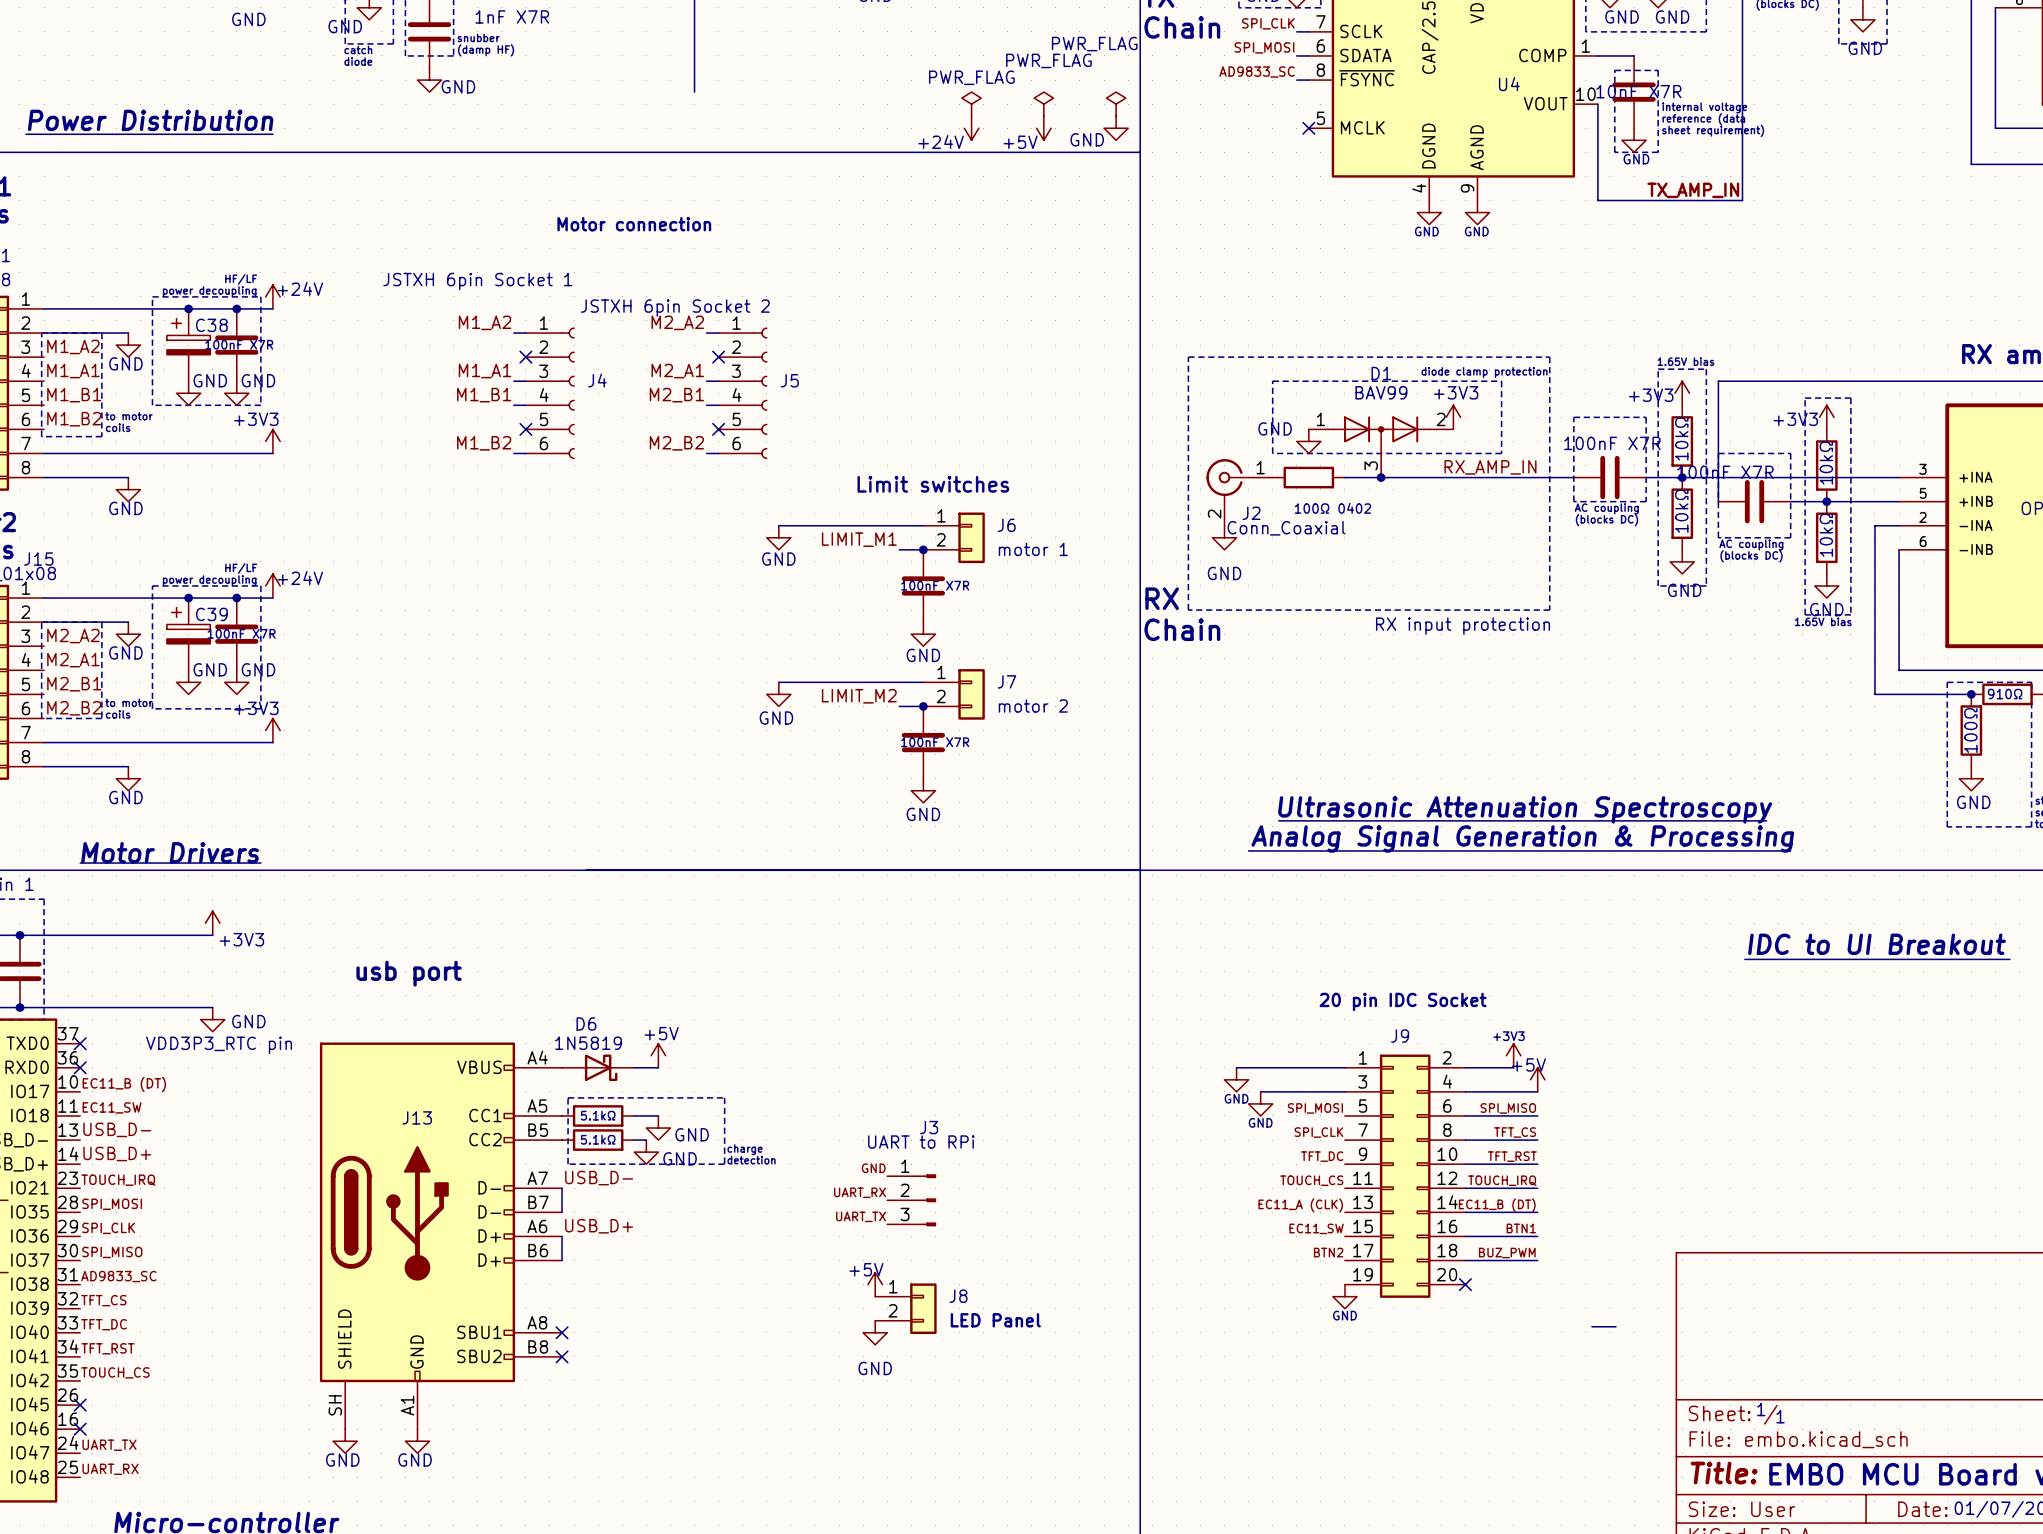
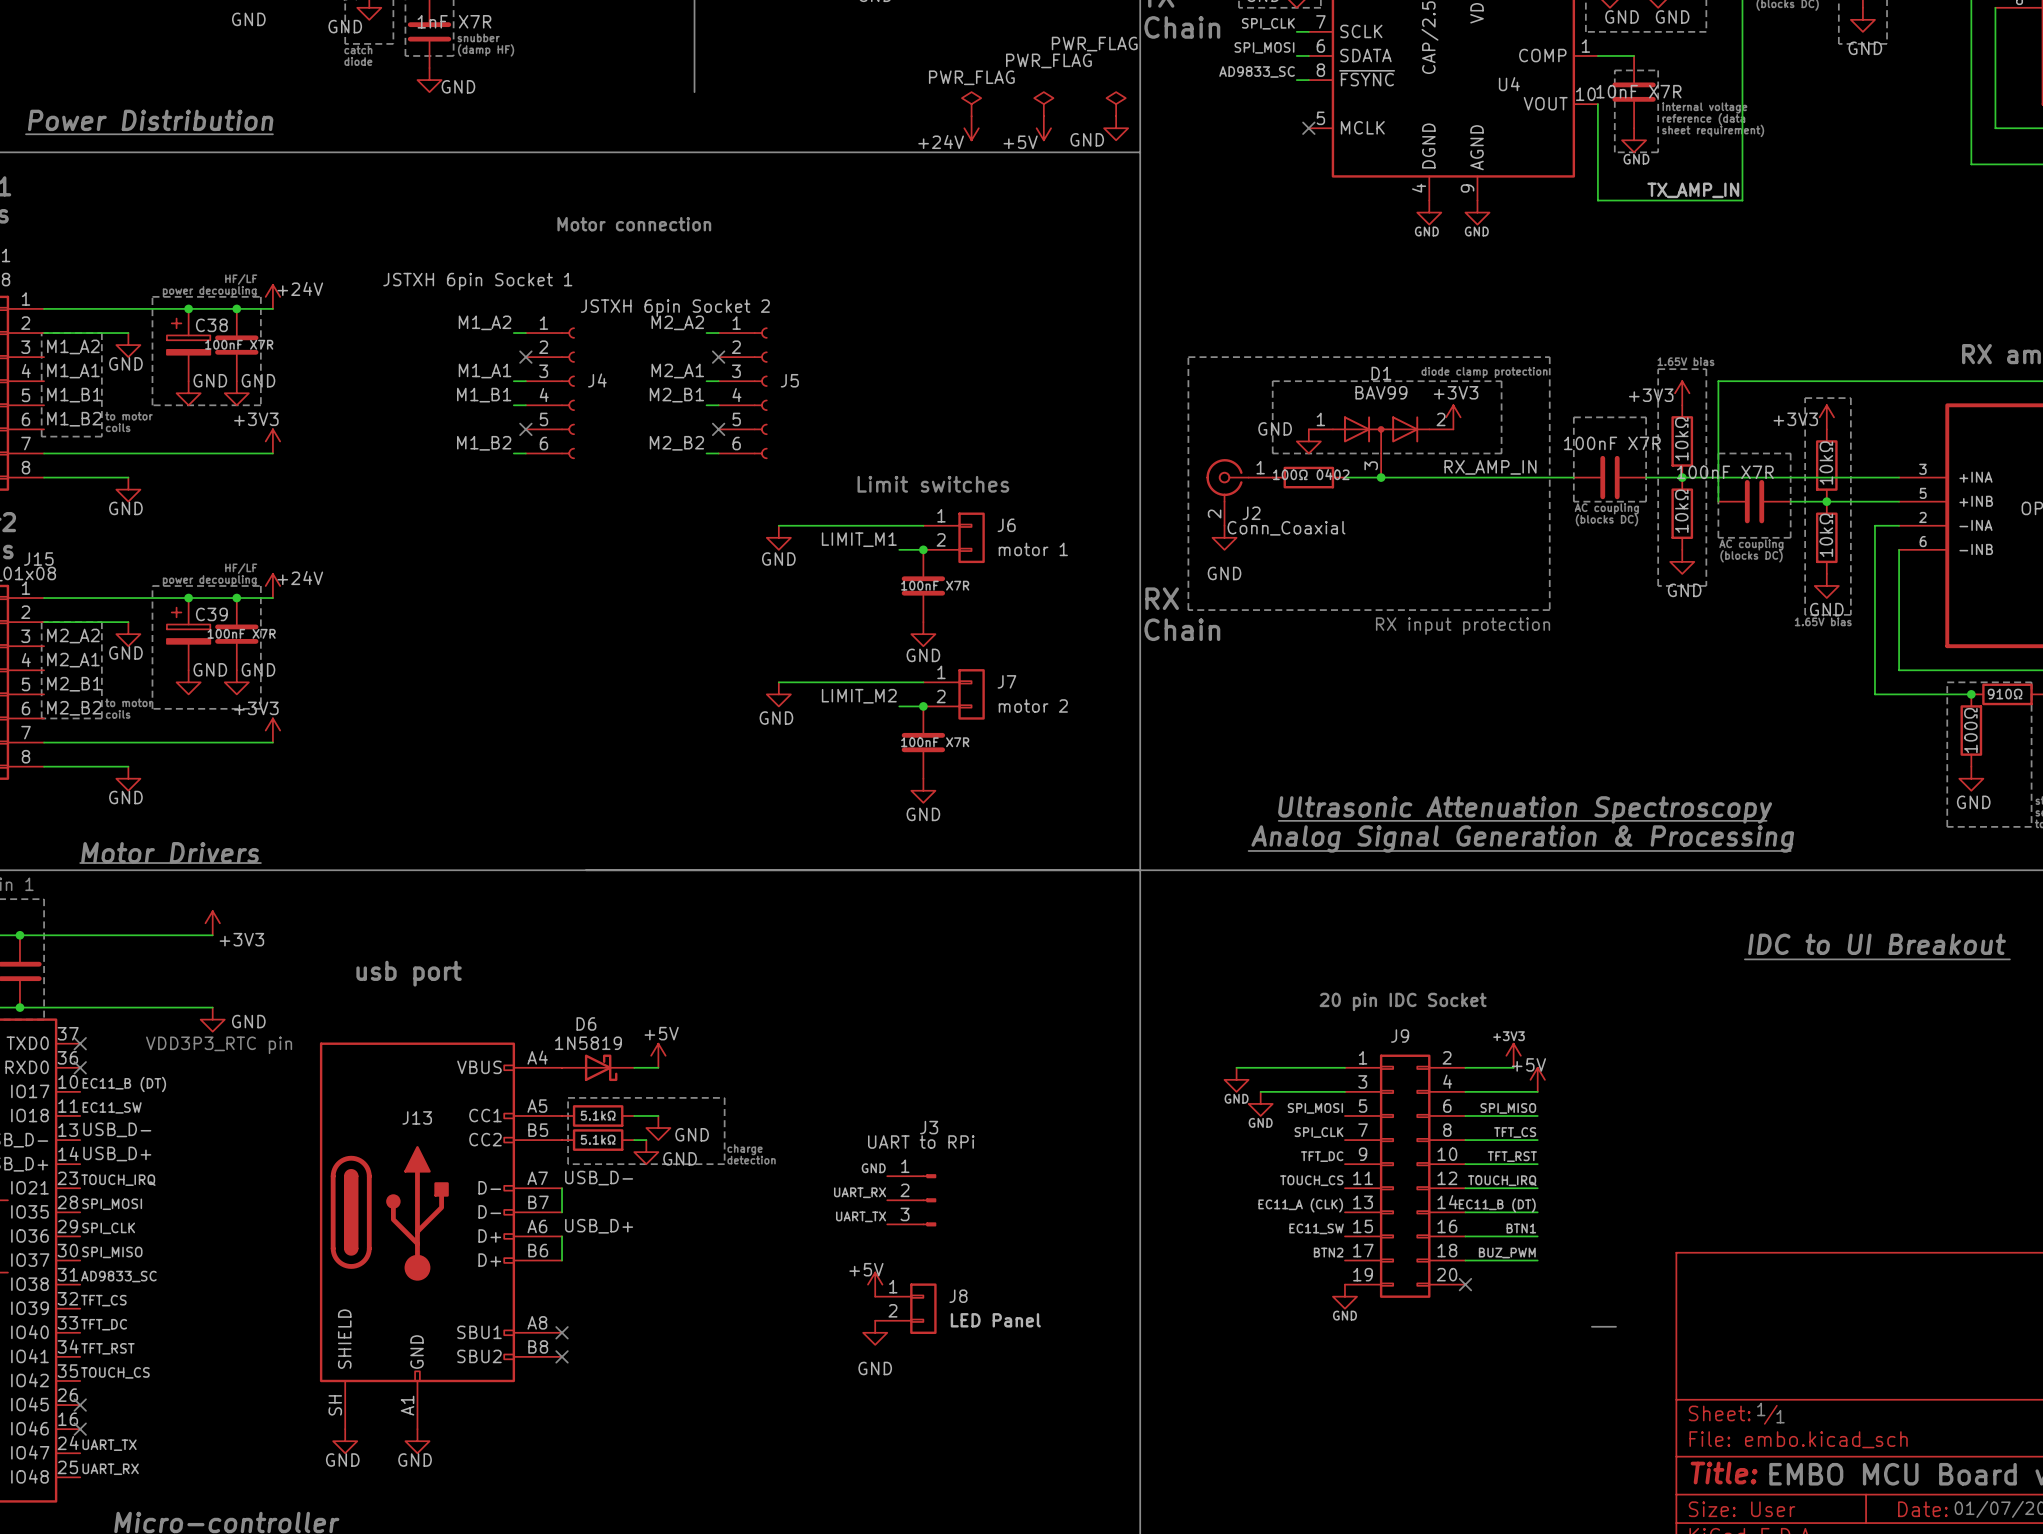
part value position: 1nF X7R (512, 16) -> 1nF X7R (454, 21)
part value position: 100Ω 0402 (1332, 508) -> 100Ω 0402 (1311, 474)

